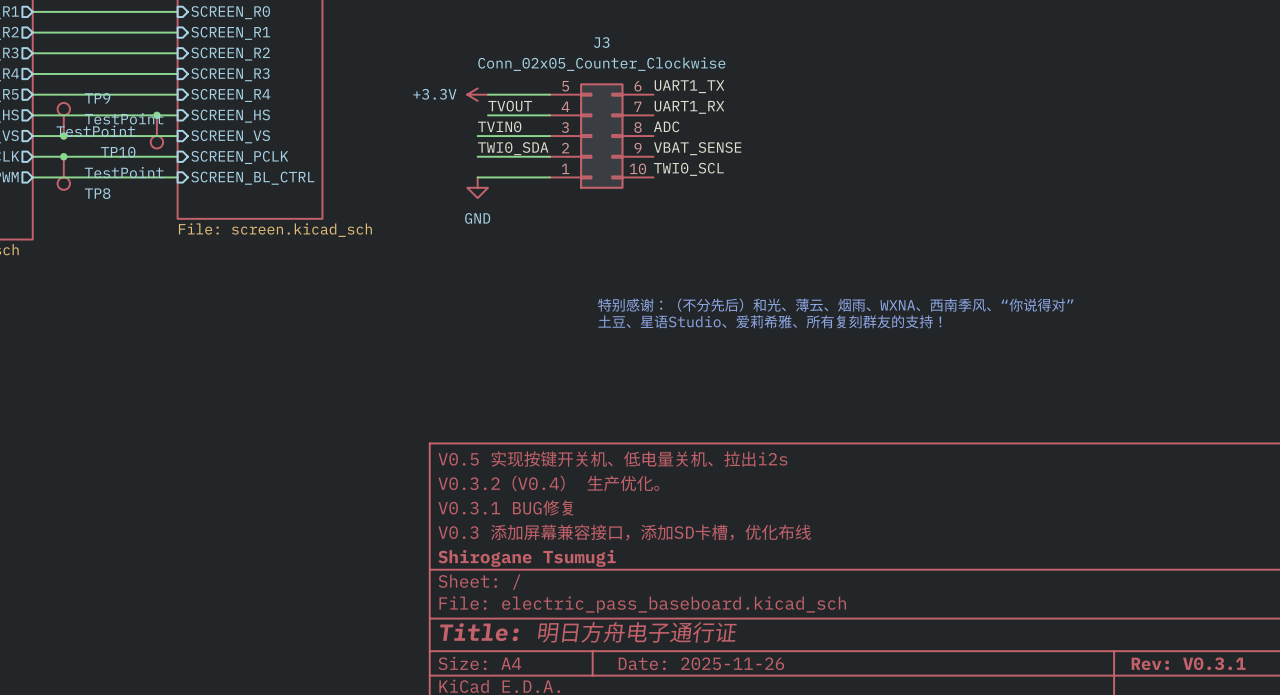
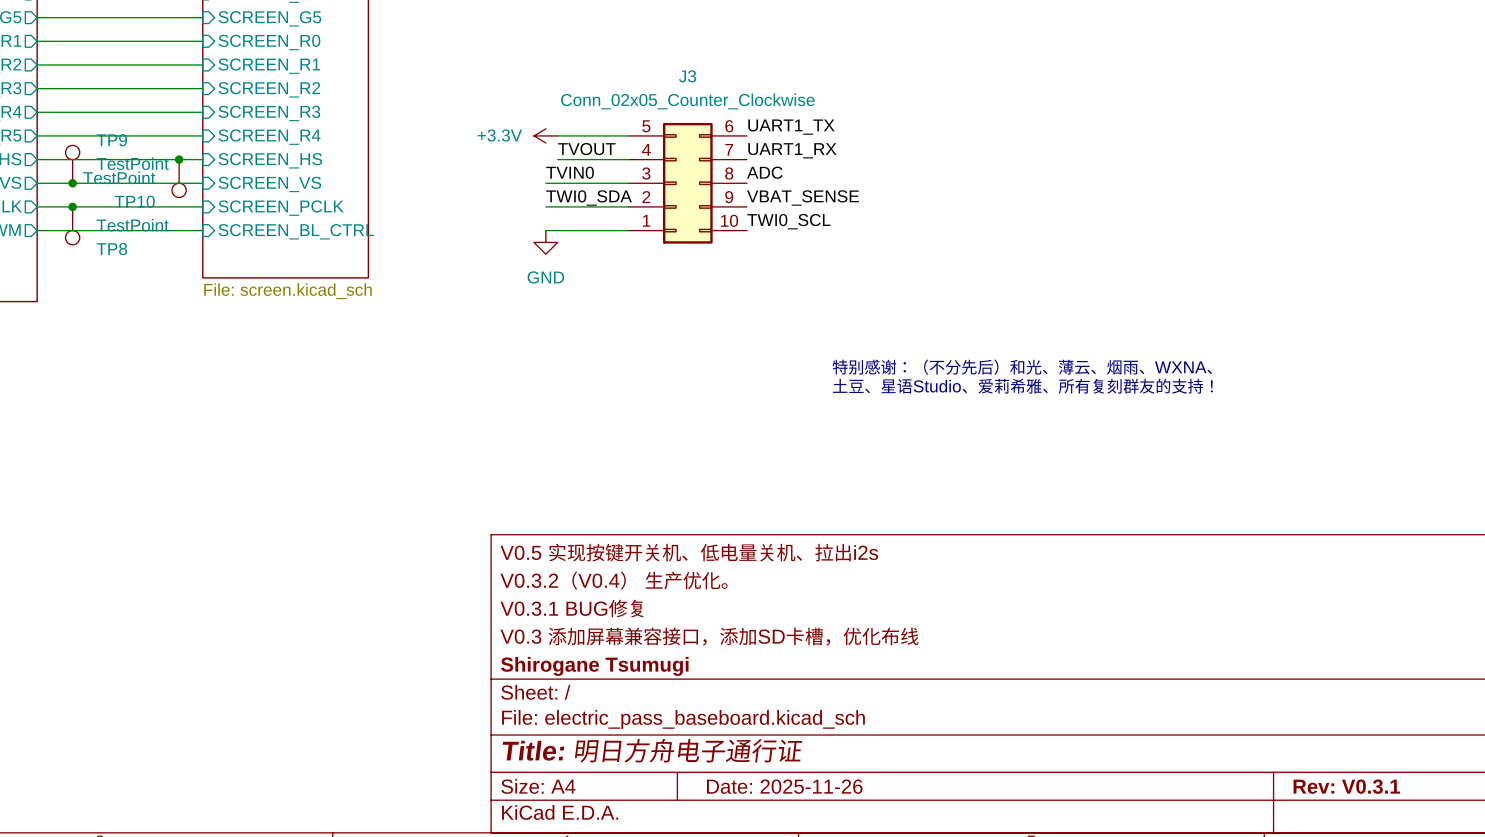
text: 特别感谢：（不分先后）和光、薄云、烟雨、WXNA、西南季风、“你说得对” (835, 305) -> 特别感谢：（不分先后）和光、薄云、烟雨、WXNA、 (1022, 367)
text position: 土豆、星语Studio、爱莉希雅、所有复刻群友的支持！ (769, 321) -> 土豆、星语Studio、爱莉希雅、所有复刻群友的支持！ (1022, 386)

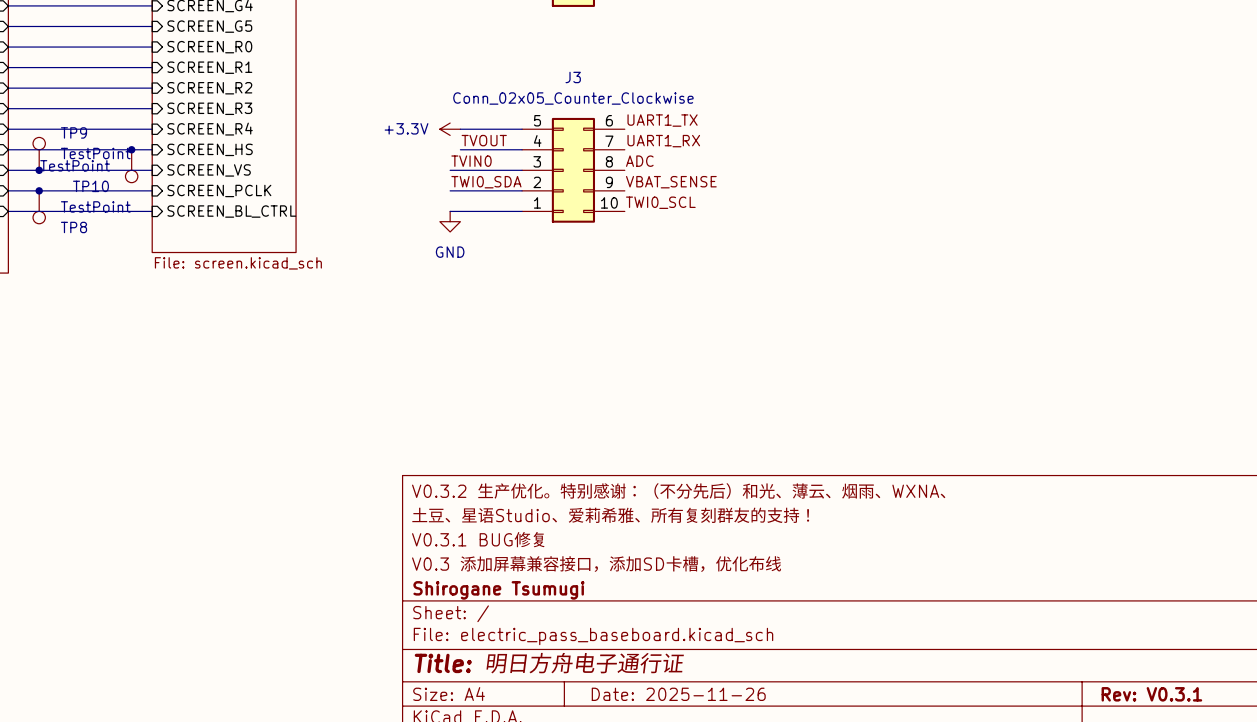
text: 特别感谢：（不分先后）和光、薄云、烟雨、WXNA、 (1022, 367) -> none
text: 土豆、星语Studio、爱莉希雅、所有复刻群友的支持！ (1022, 386) -> none
title block: V0.5 实现按键开关机、低电量关机、拉出i2s (689, 552) -> V0.3.2 生产优化。特别感谢：（不分先后）和光、薄云、烟雨、WXNA、 (679, 491)
title block: V0.3.2（V0.4） 生产优化。 (614, 580) -> 土豆、星语Studio、爱莉希雅、所有复刻群友的支持！ (610, 515)

